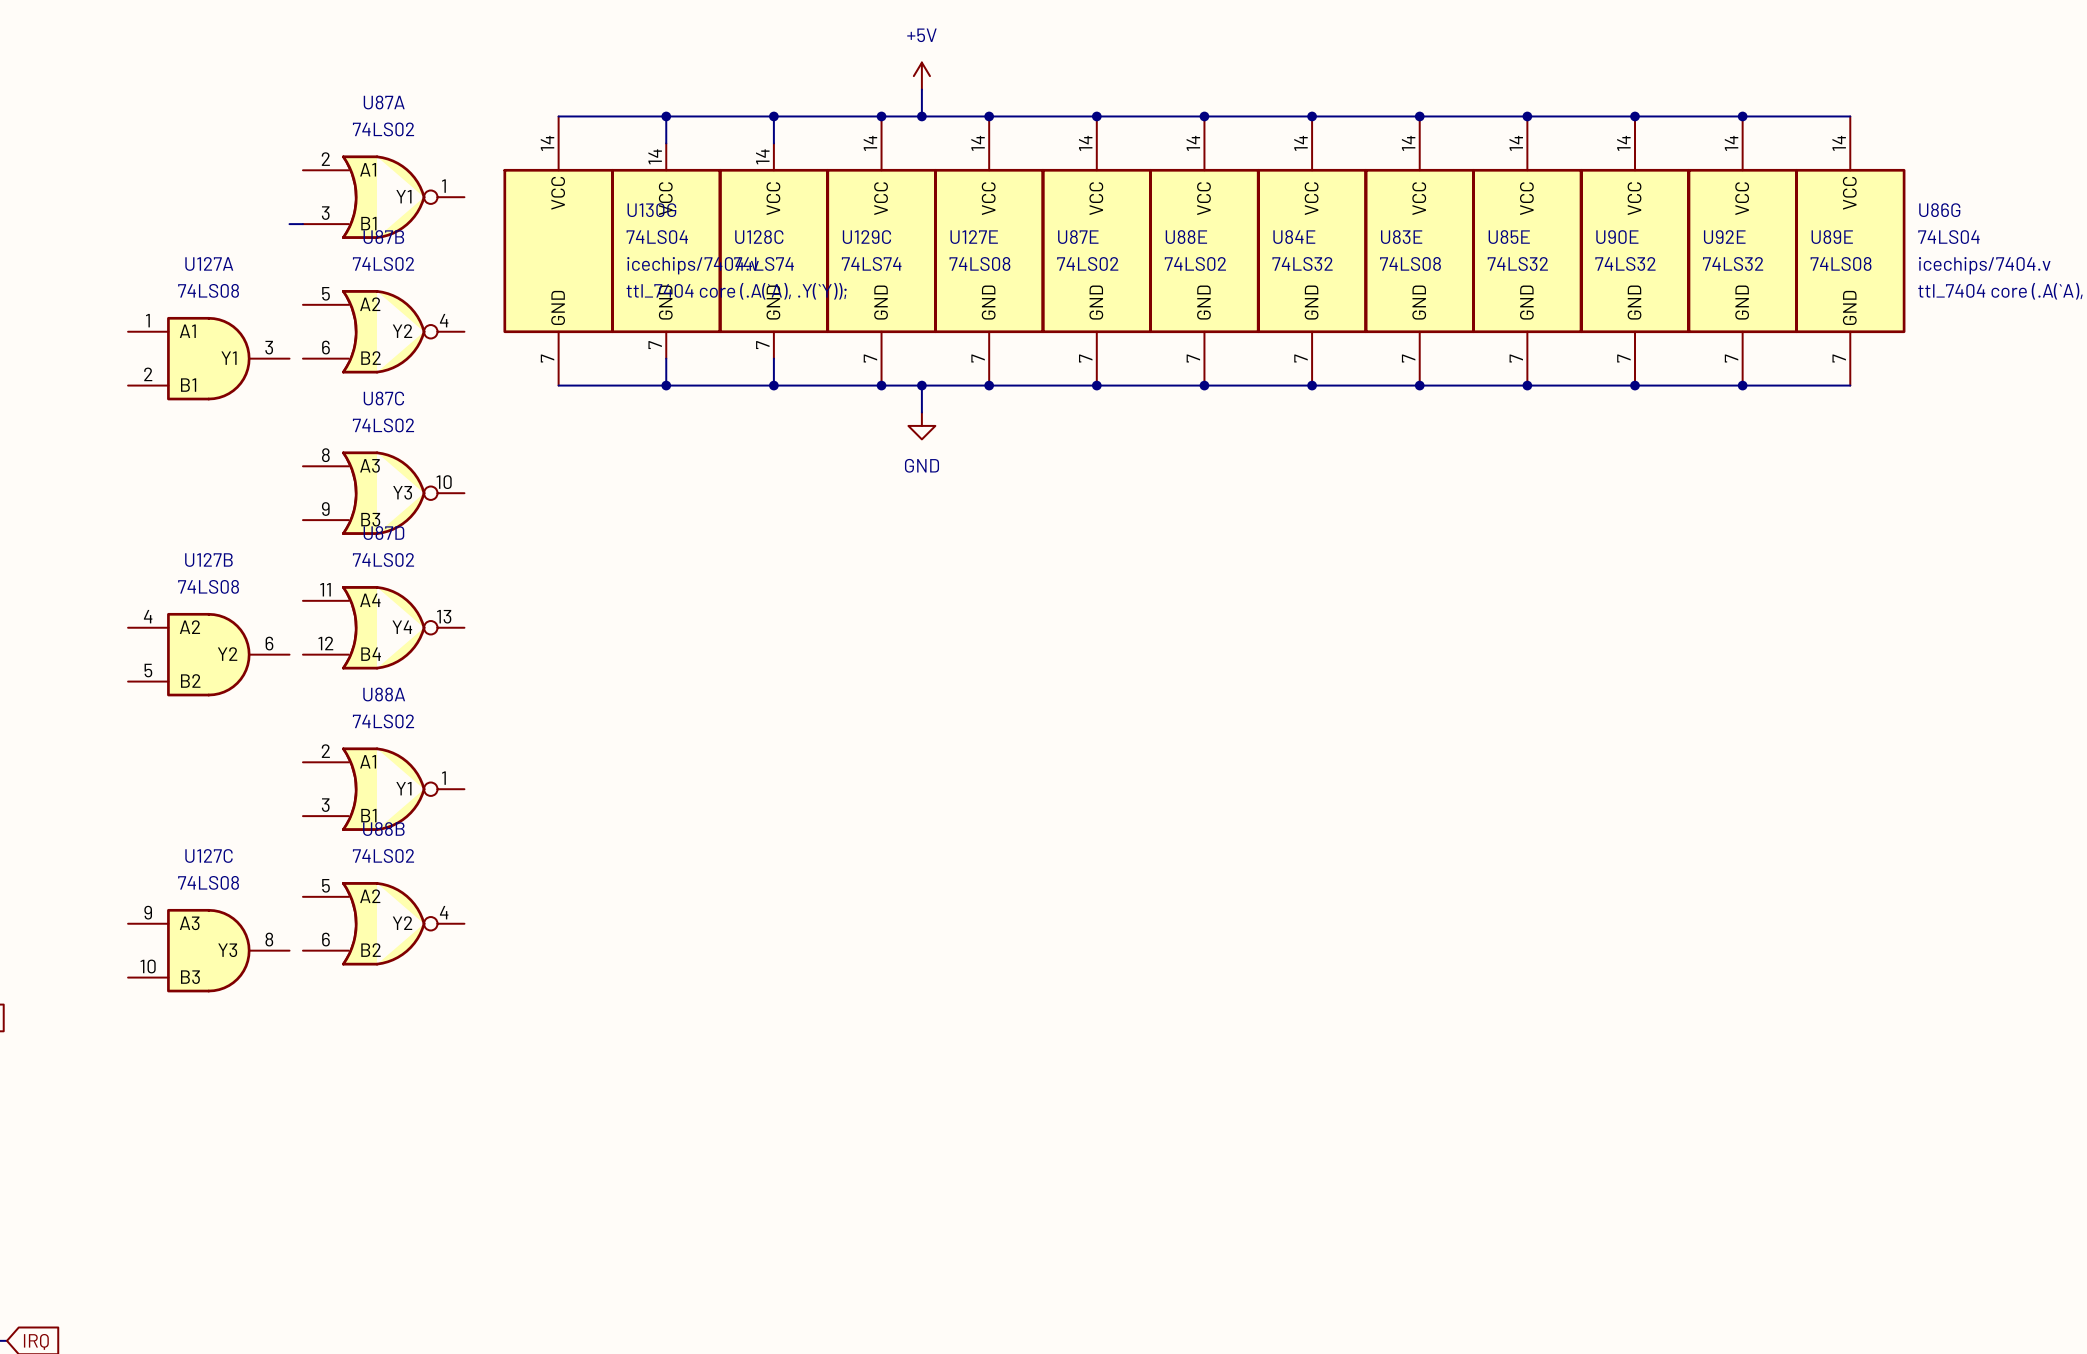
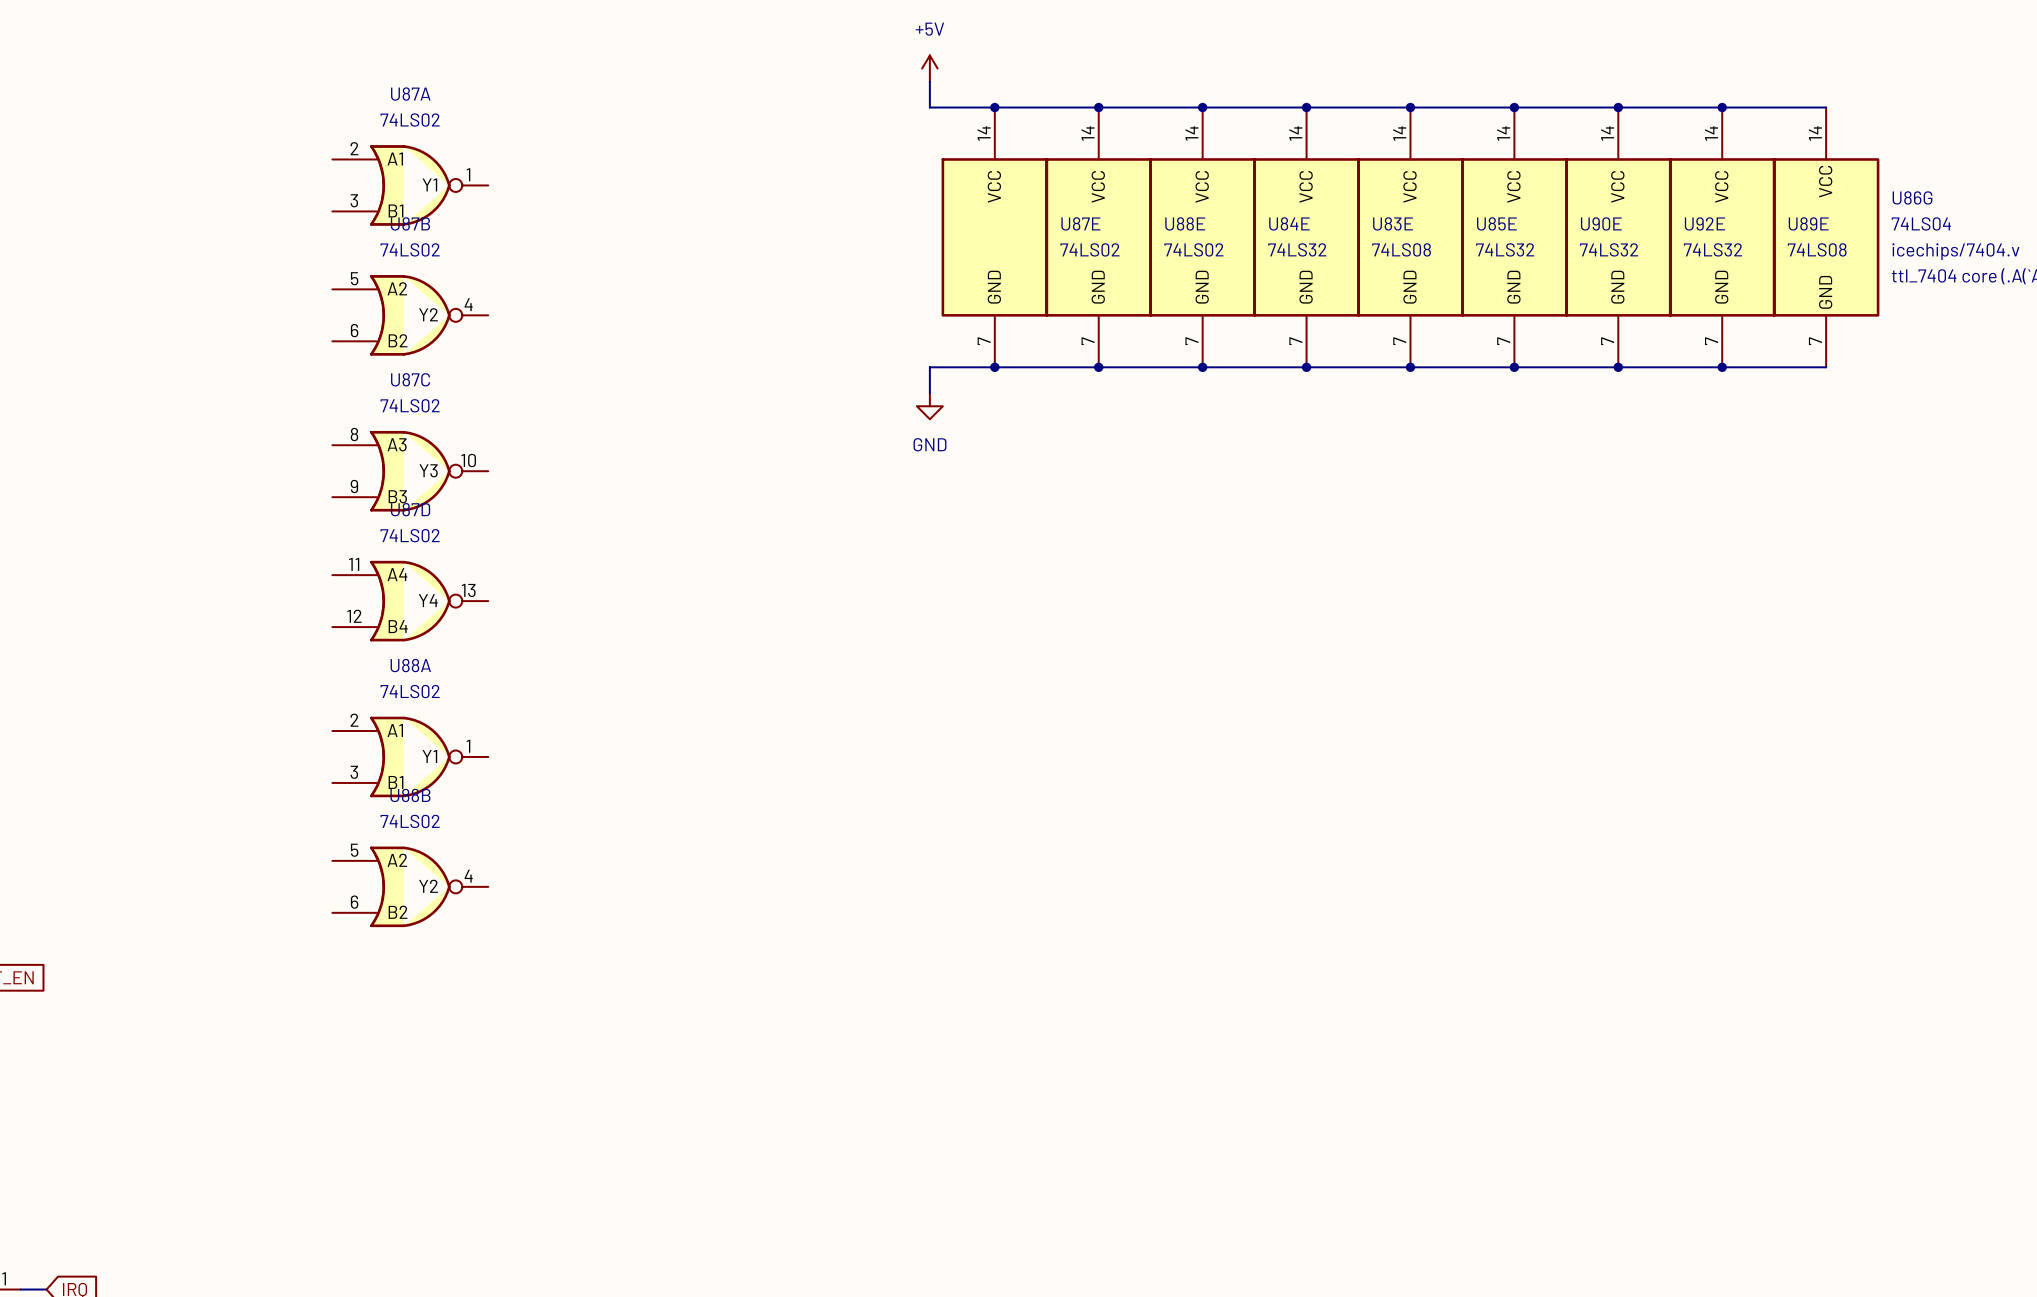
wire: (558, 116) (921, 116) -> none
wire: (666, 116) (666, 143) -> none
junction: (666, 116) -> none
wire: (773, 116) (773, 143) -> none
junction: (773, 116) -> none
junction: (881, 116) -> none
junction: (921, 116) -> none
wire: (289, 224) (302, 224) -> none
U130G: 74LS04 (558, 251) -> none
U128C: 74LS74 (666, 251) -> none
U129C: 74LS74 (773, 251) -> none
U127E: 74LS08 (881, 251) -> none
U127A: 74LS08 (208, 358) -> none
wire: (666, 358) (666, 385) -> none
wire: (773, 358) (773, 385) -> none
wire: (558, 385) (921, 385) -> none
junction: (666, 385) -> none
junction: (773, 385) -> none
junction: (881, 385) -> none
junction: (921, 385) -> none
U127B: 74LS08 (208, 654) -> none
U127C: 74LS08 (208, 950) -> none

